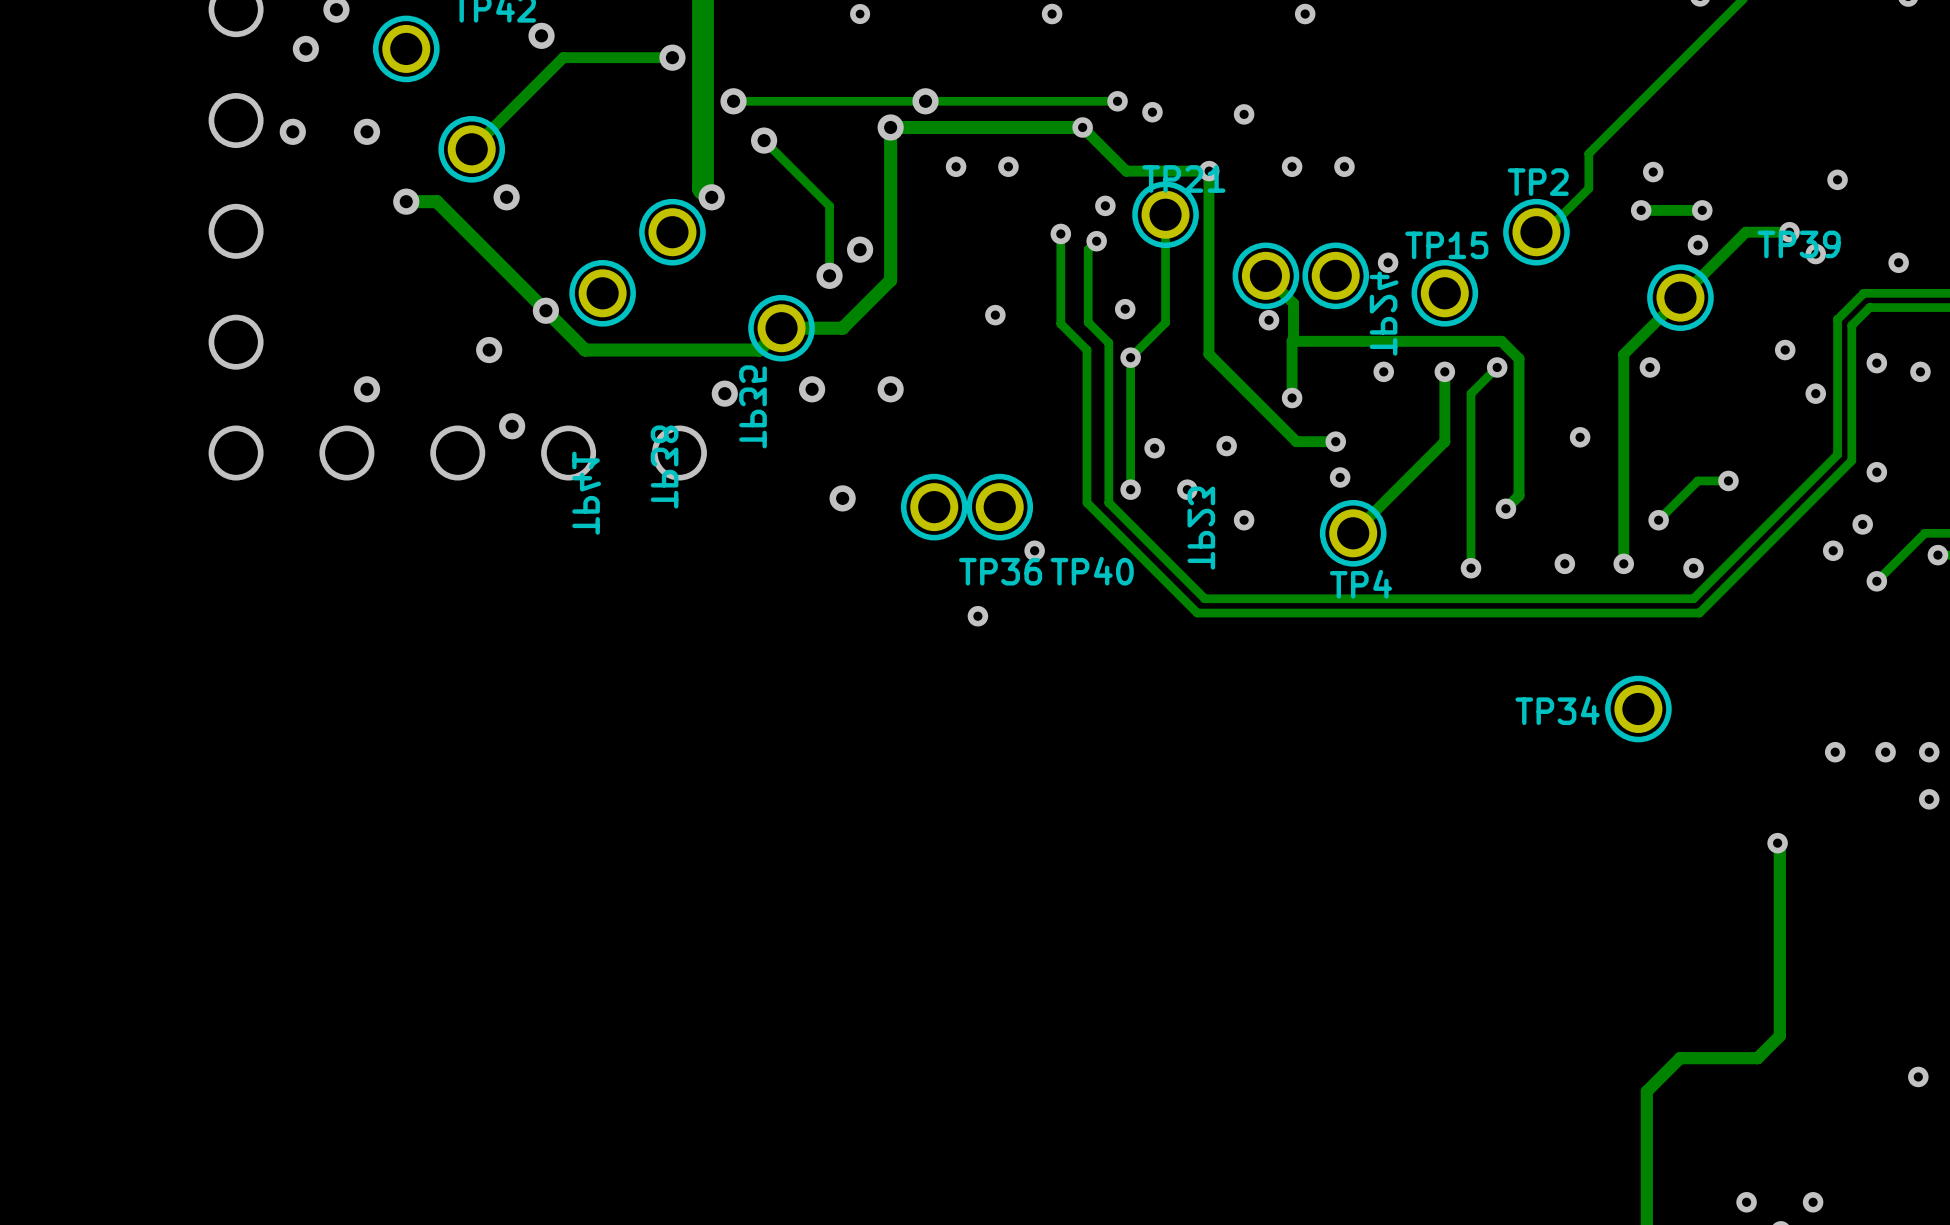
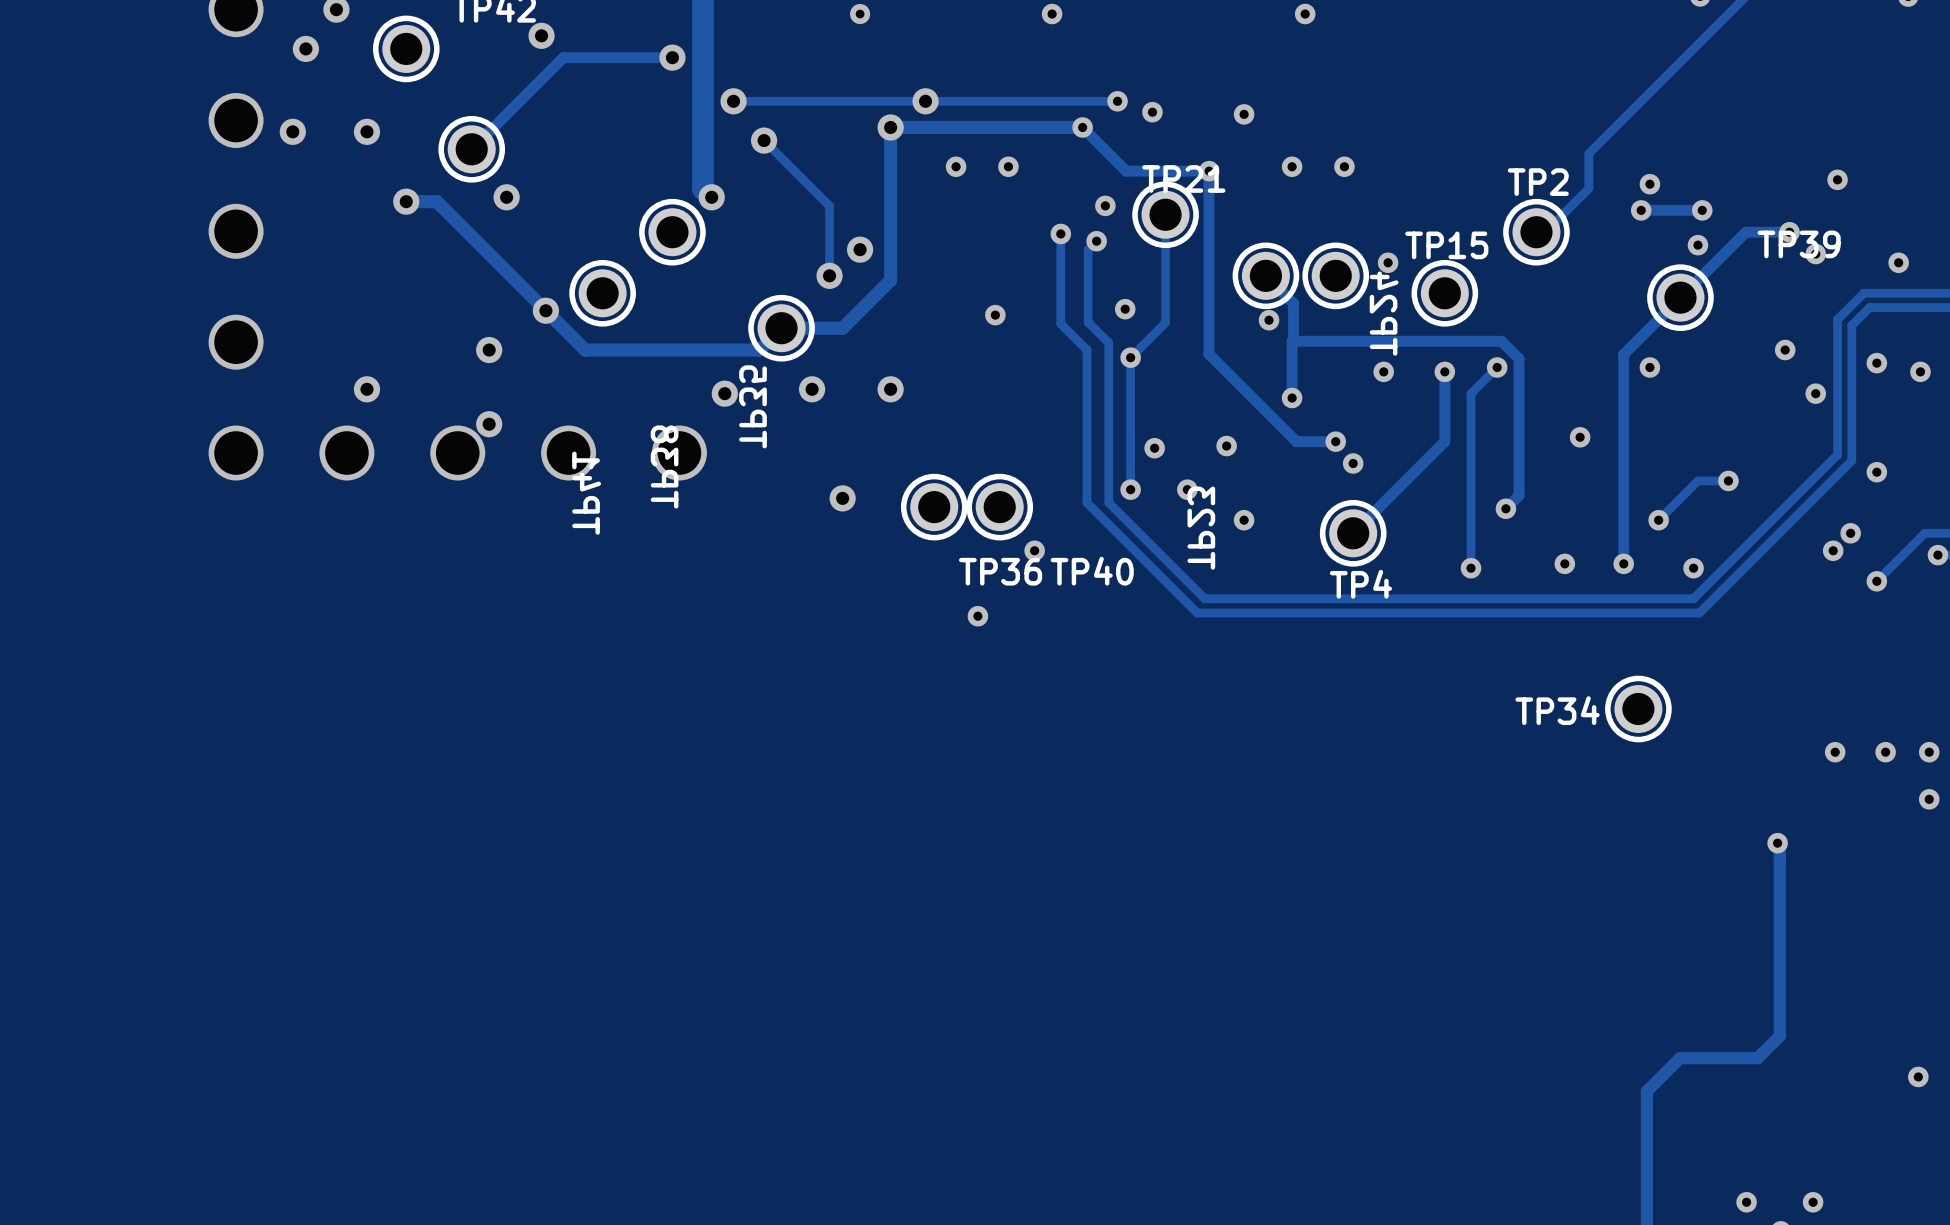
via position: (1653, 172) -> (1649, 184)
via position: (512, 426) -> (489, 424)
via position: (1340, 477) -> (1353, 463)
via position: (1862, 524) -> (1850, 533)

